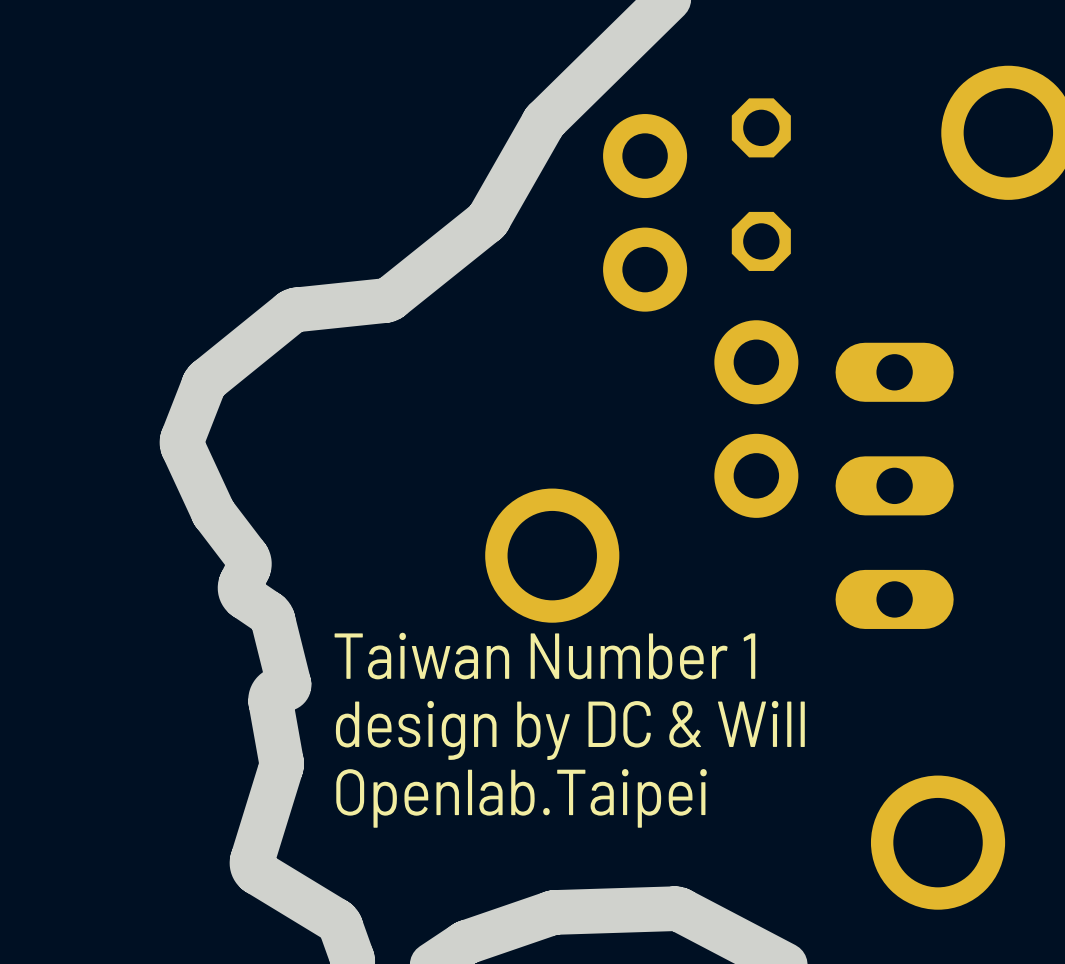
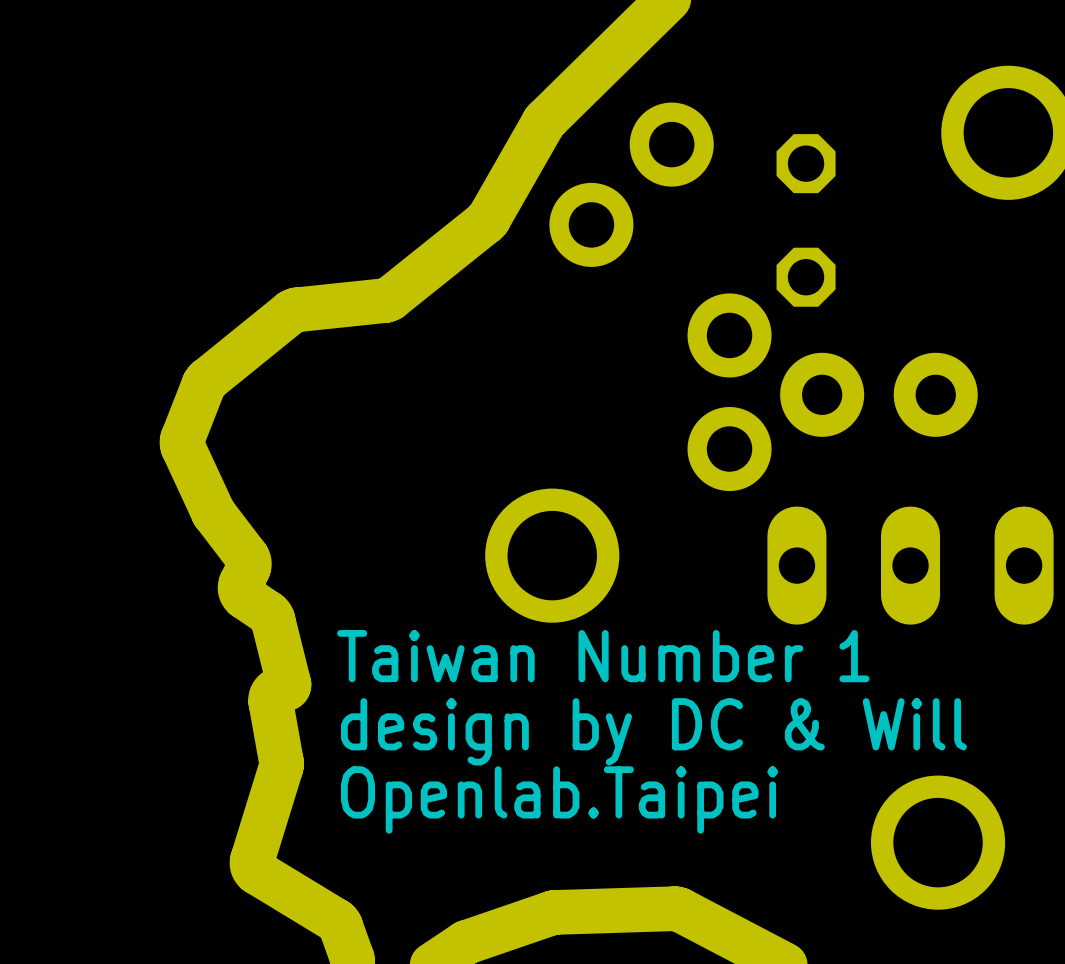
part position: (761, 184) -> (806, 220)
part rotation: 0° (645, 212) -> 45° clockwise (631, 184)
part: none -> (878, 394)
part position: (756, 419) -> (729, 392)
part rotation: 0° (894, 485) -> 90° clockwise (910, 565)

